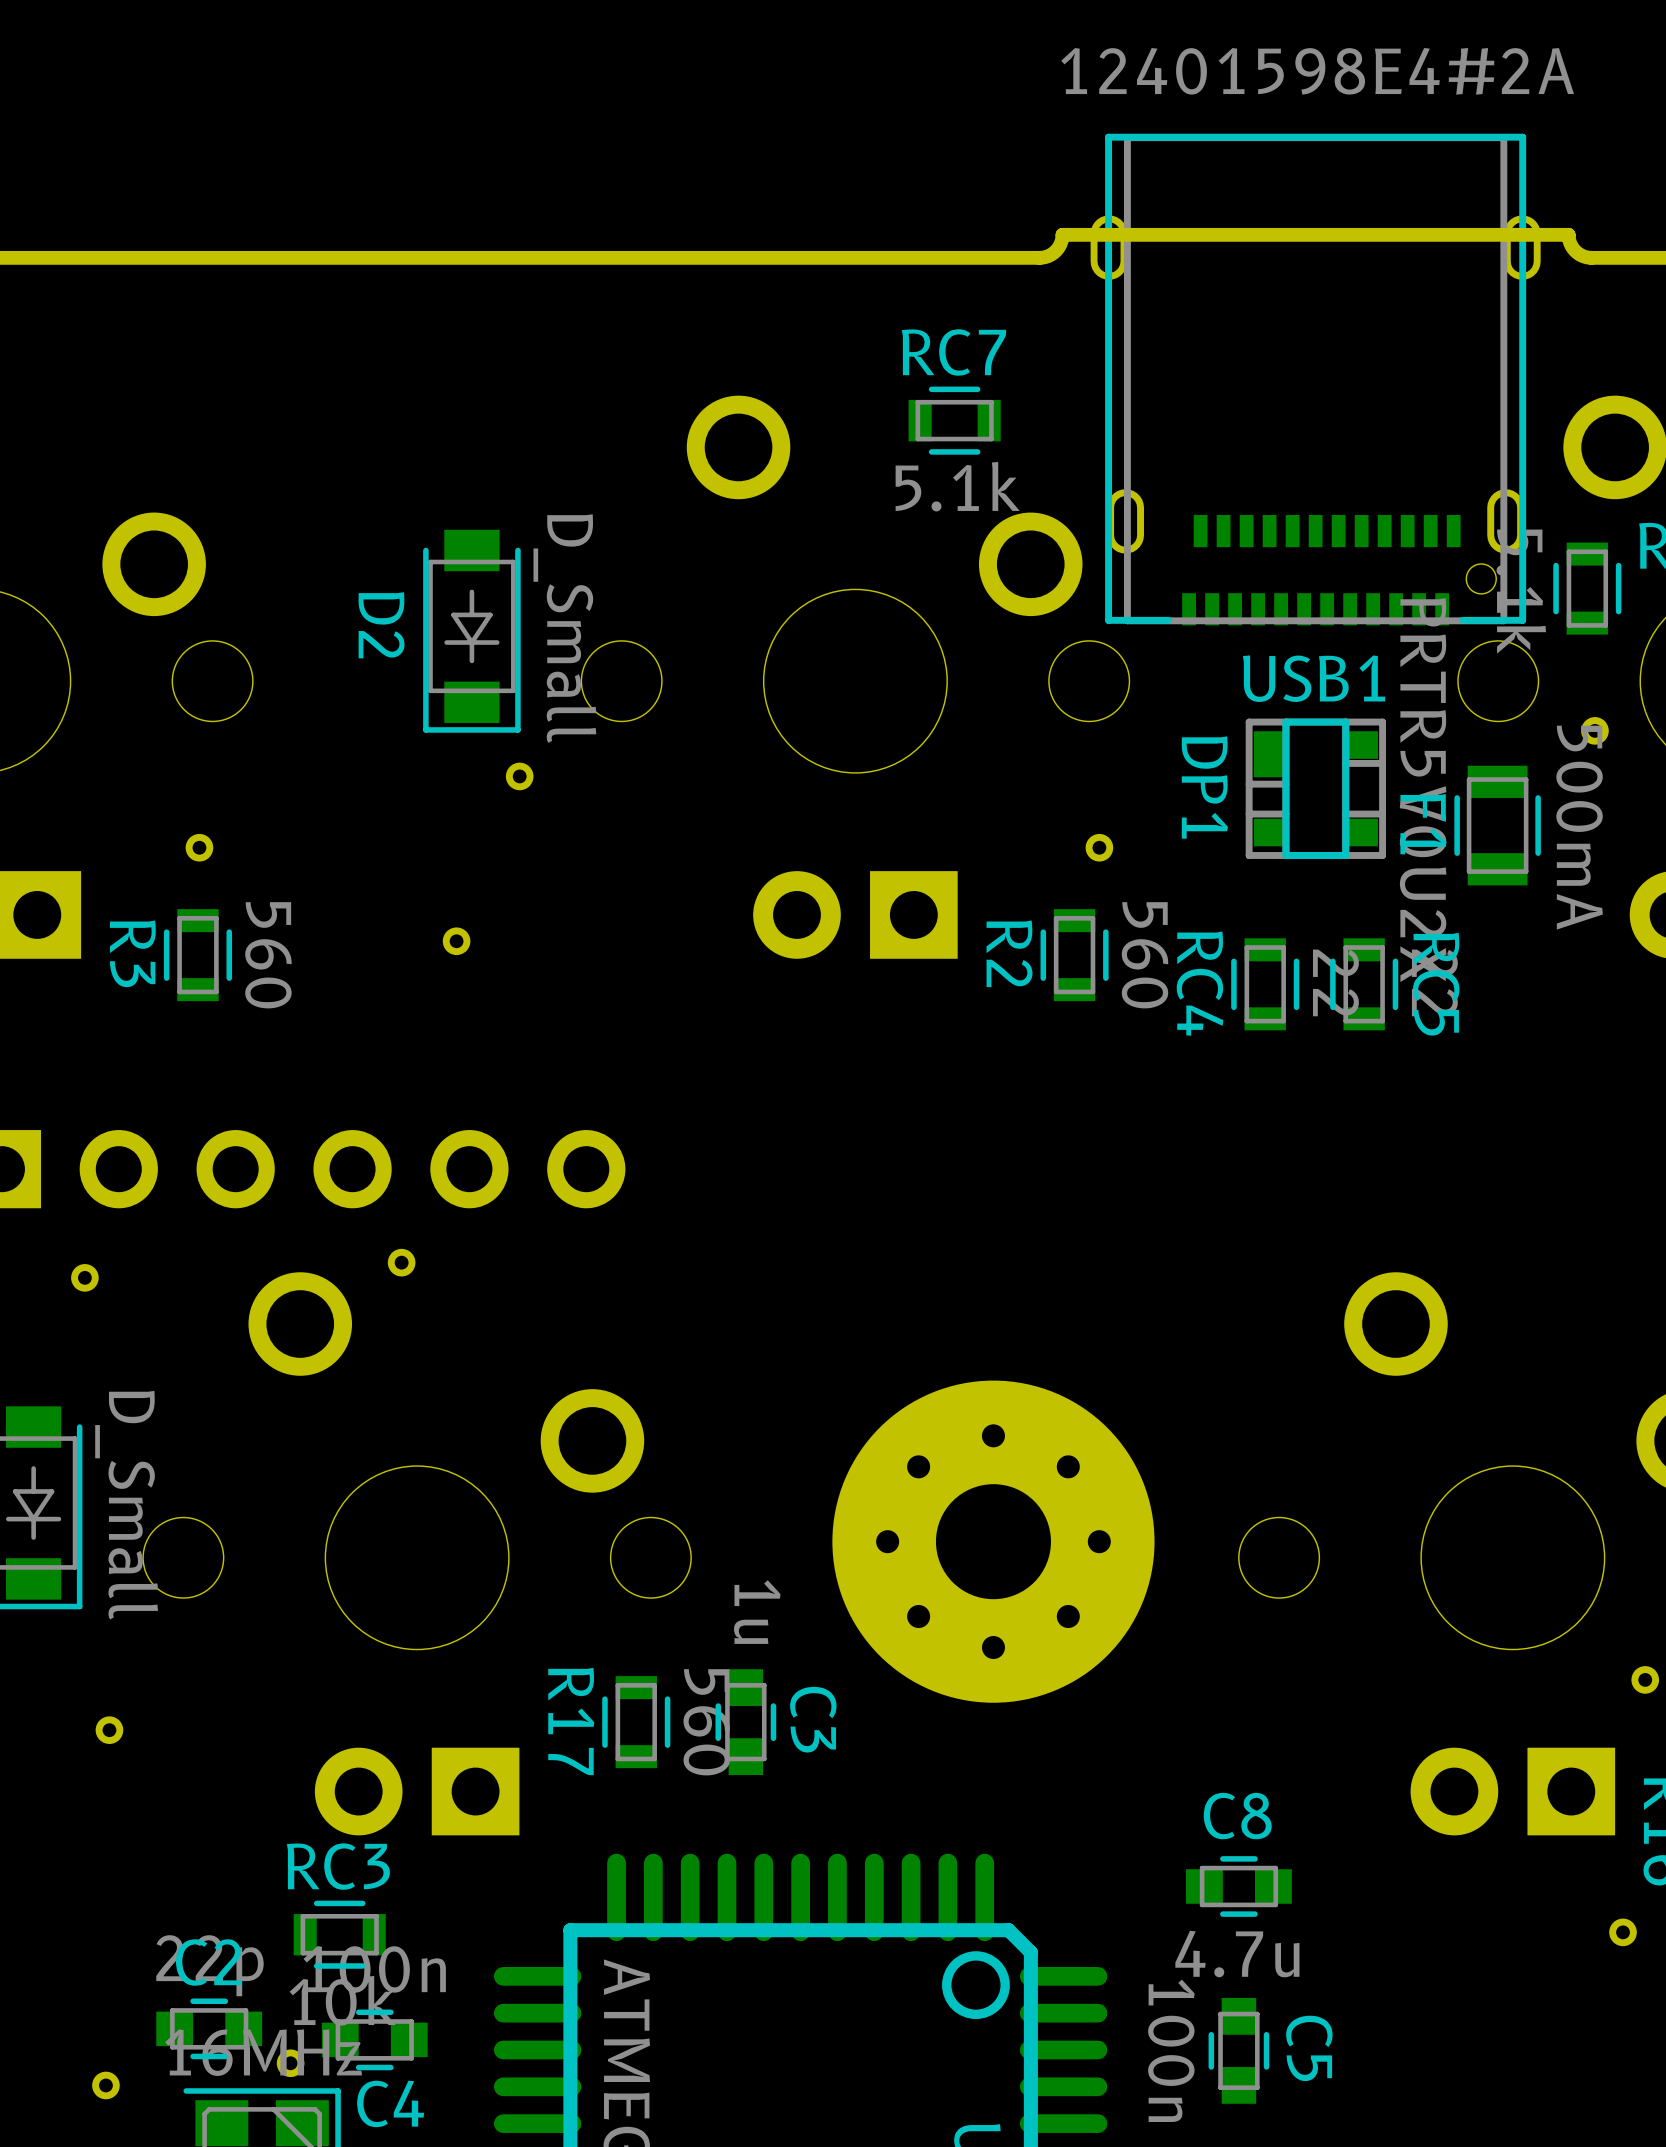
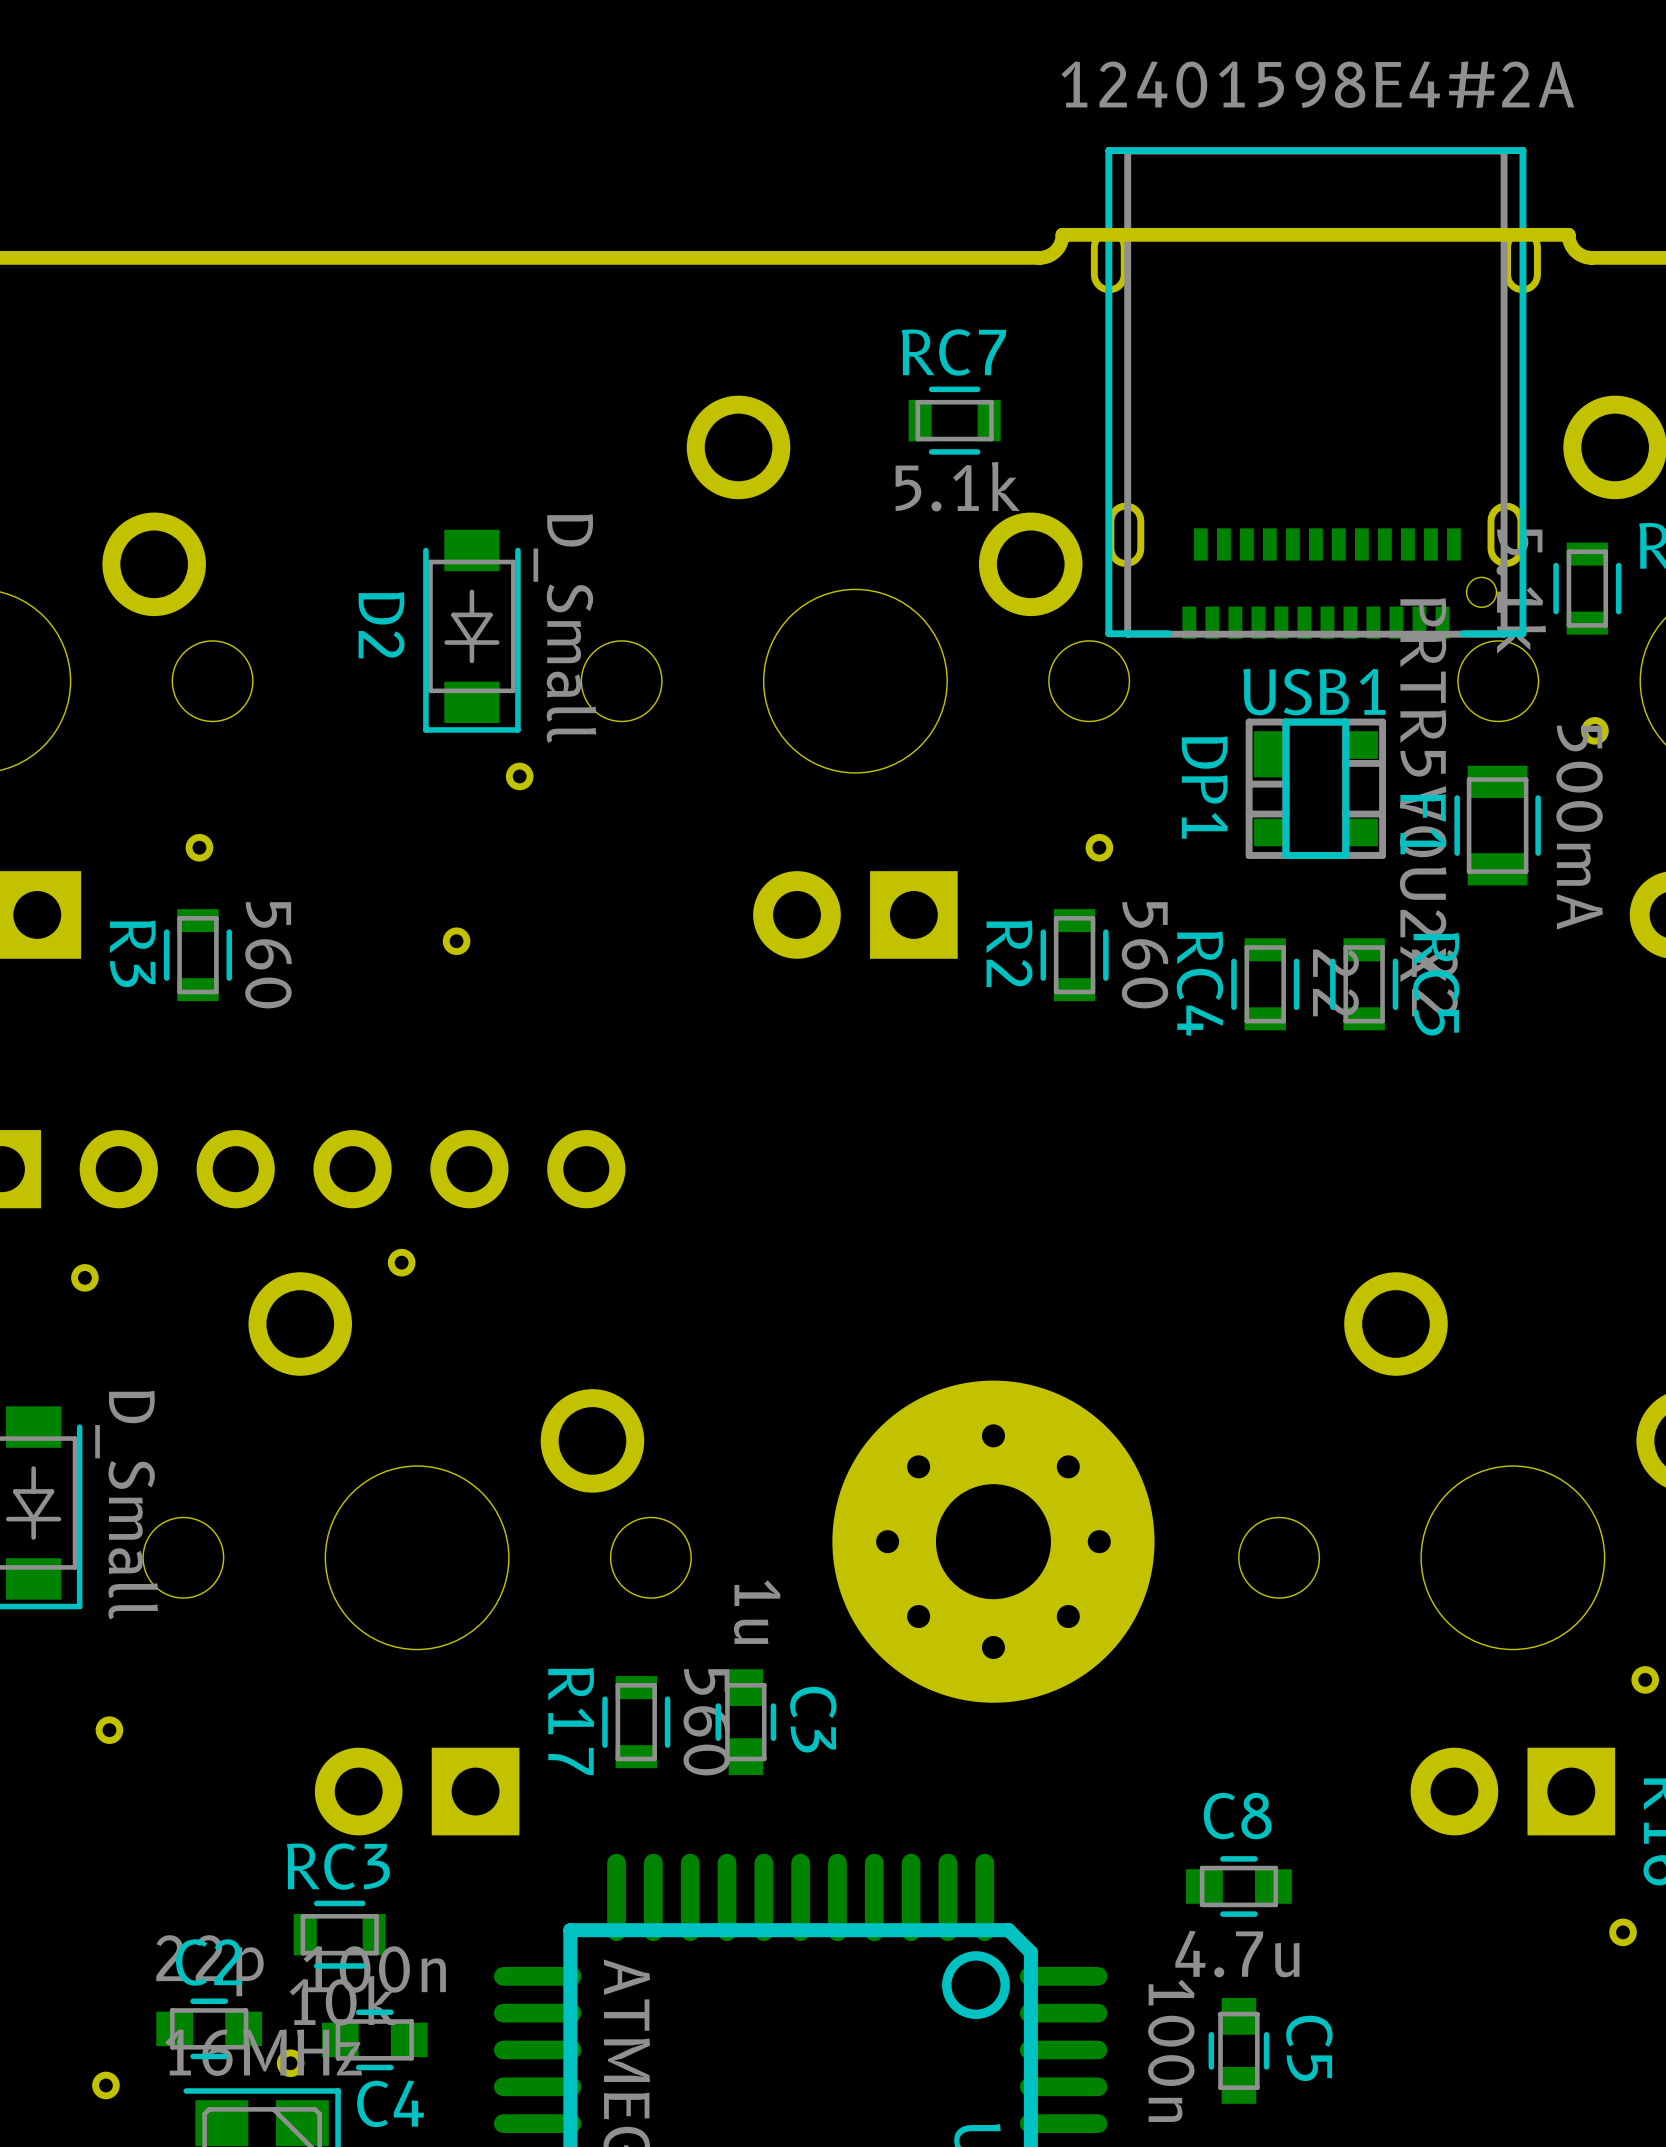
USB1 position: (1315, 379) -> (1315, 392)

